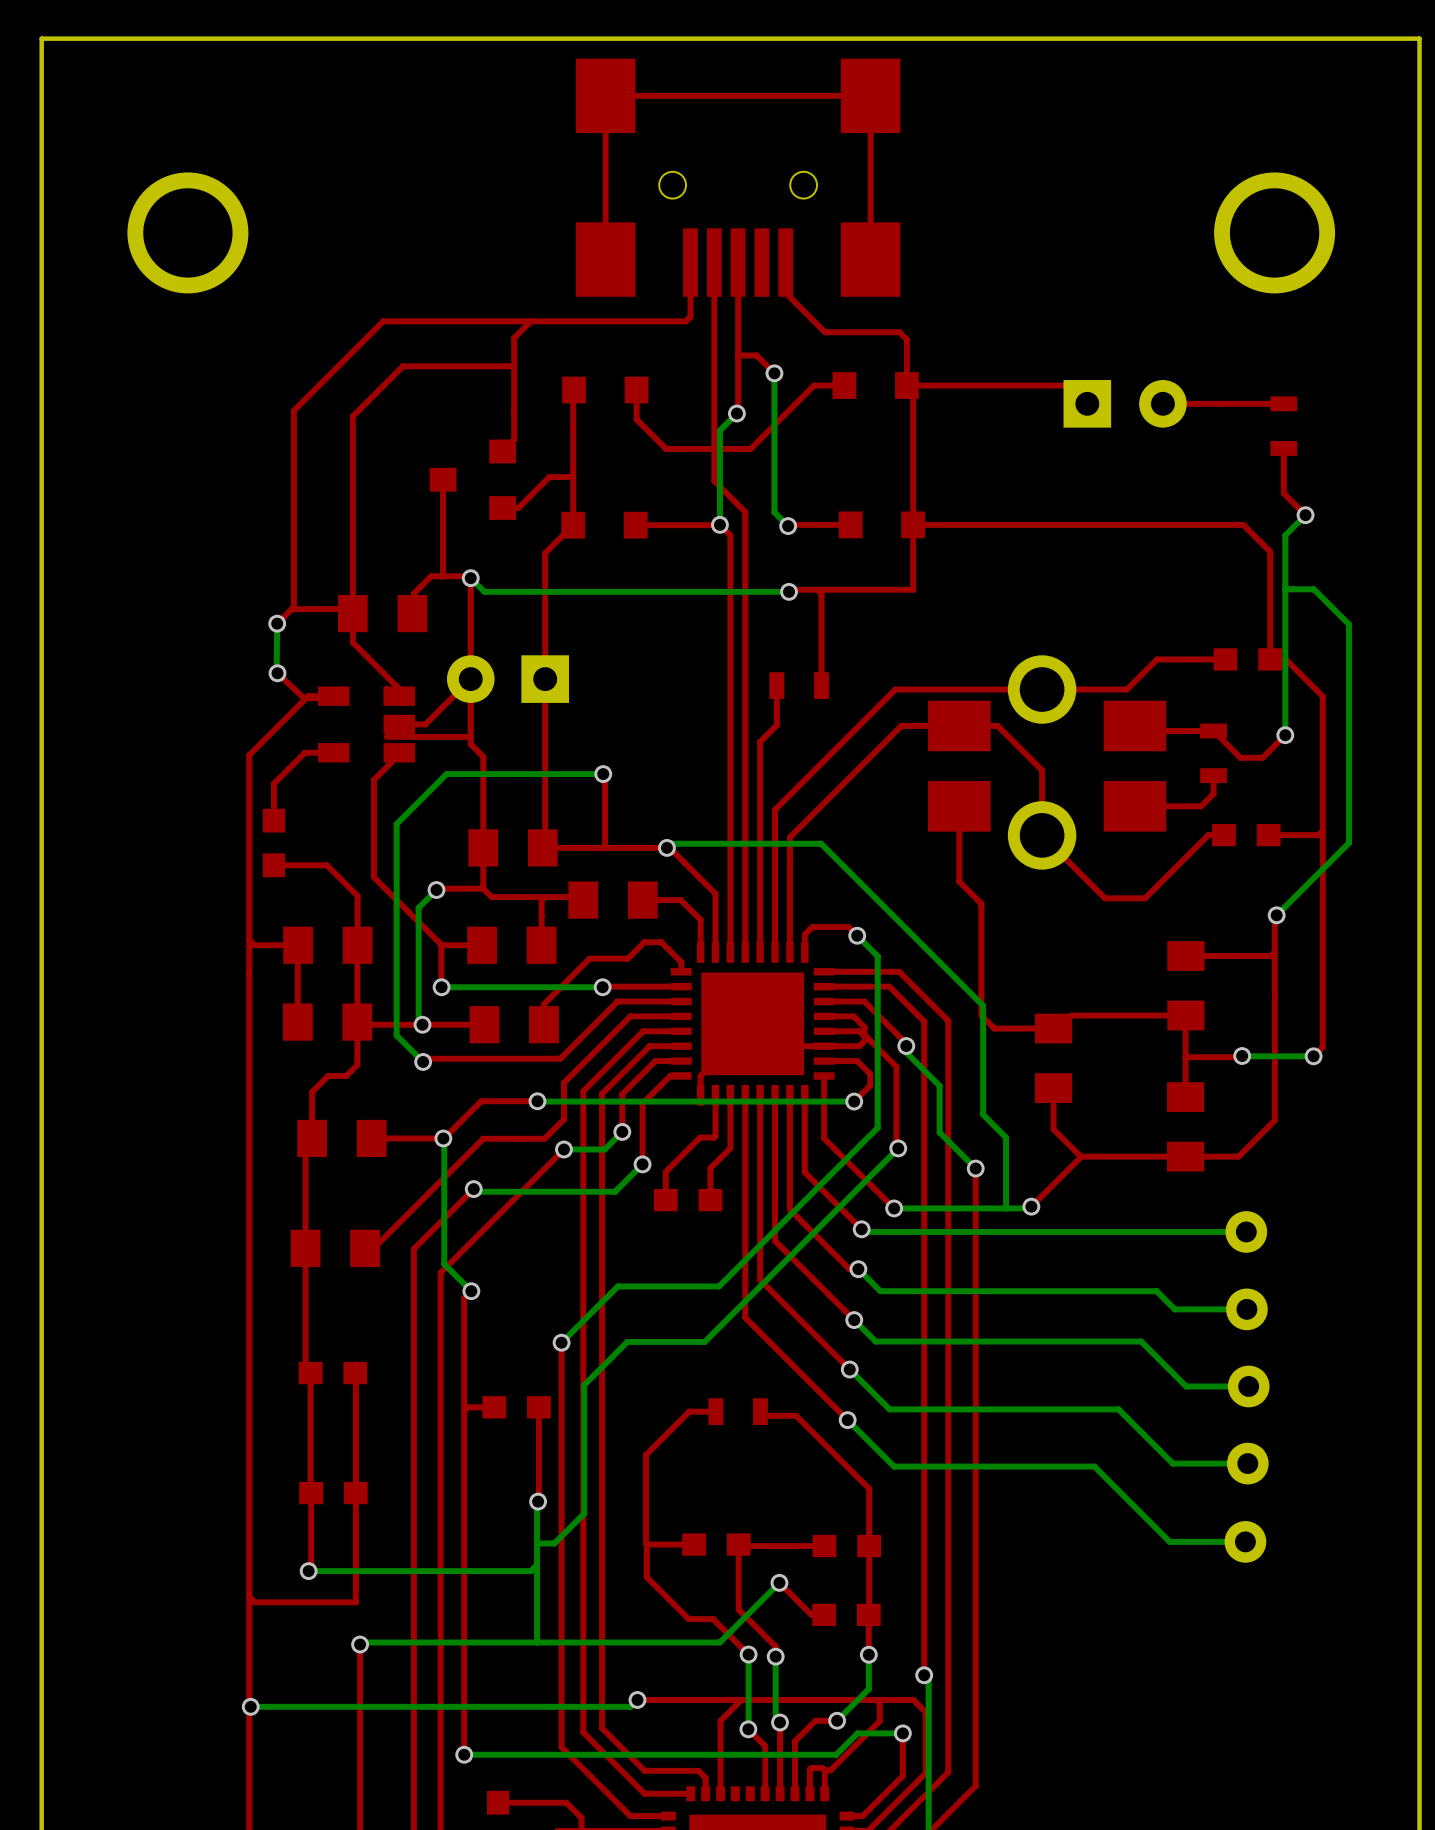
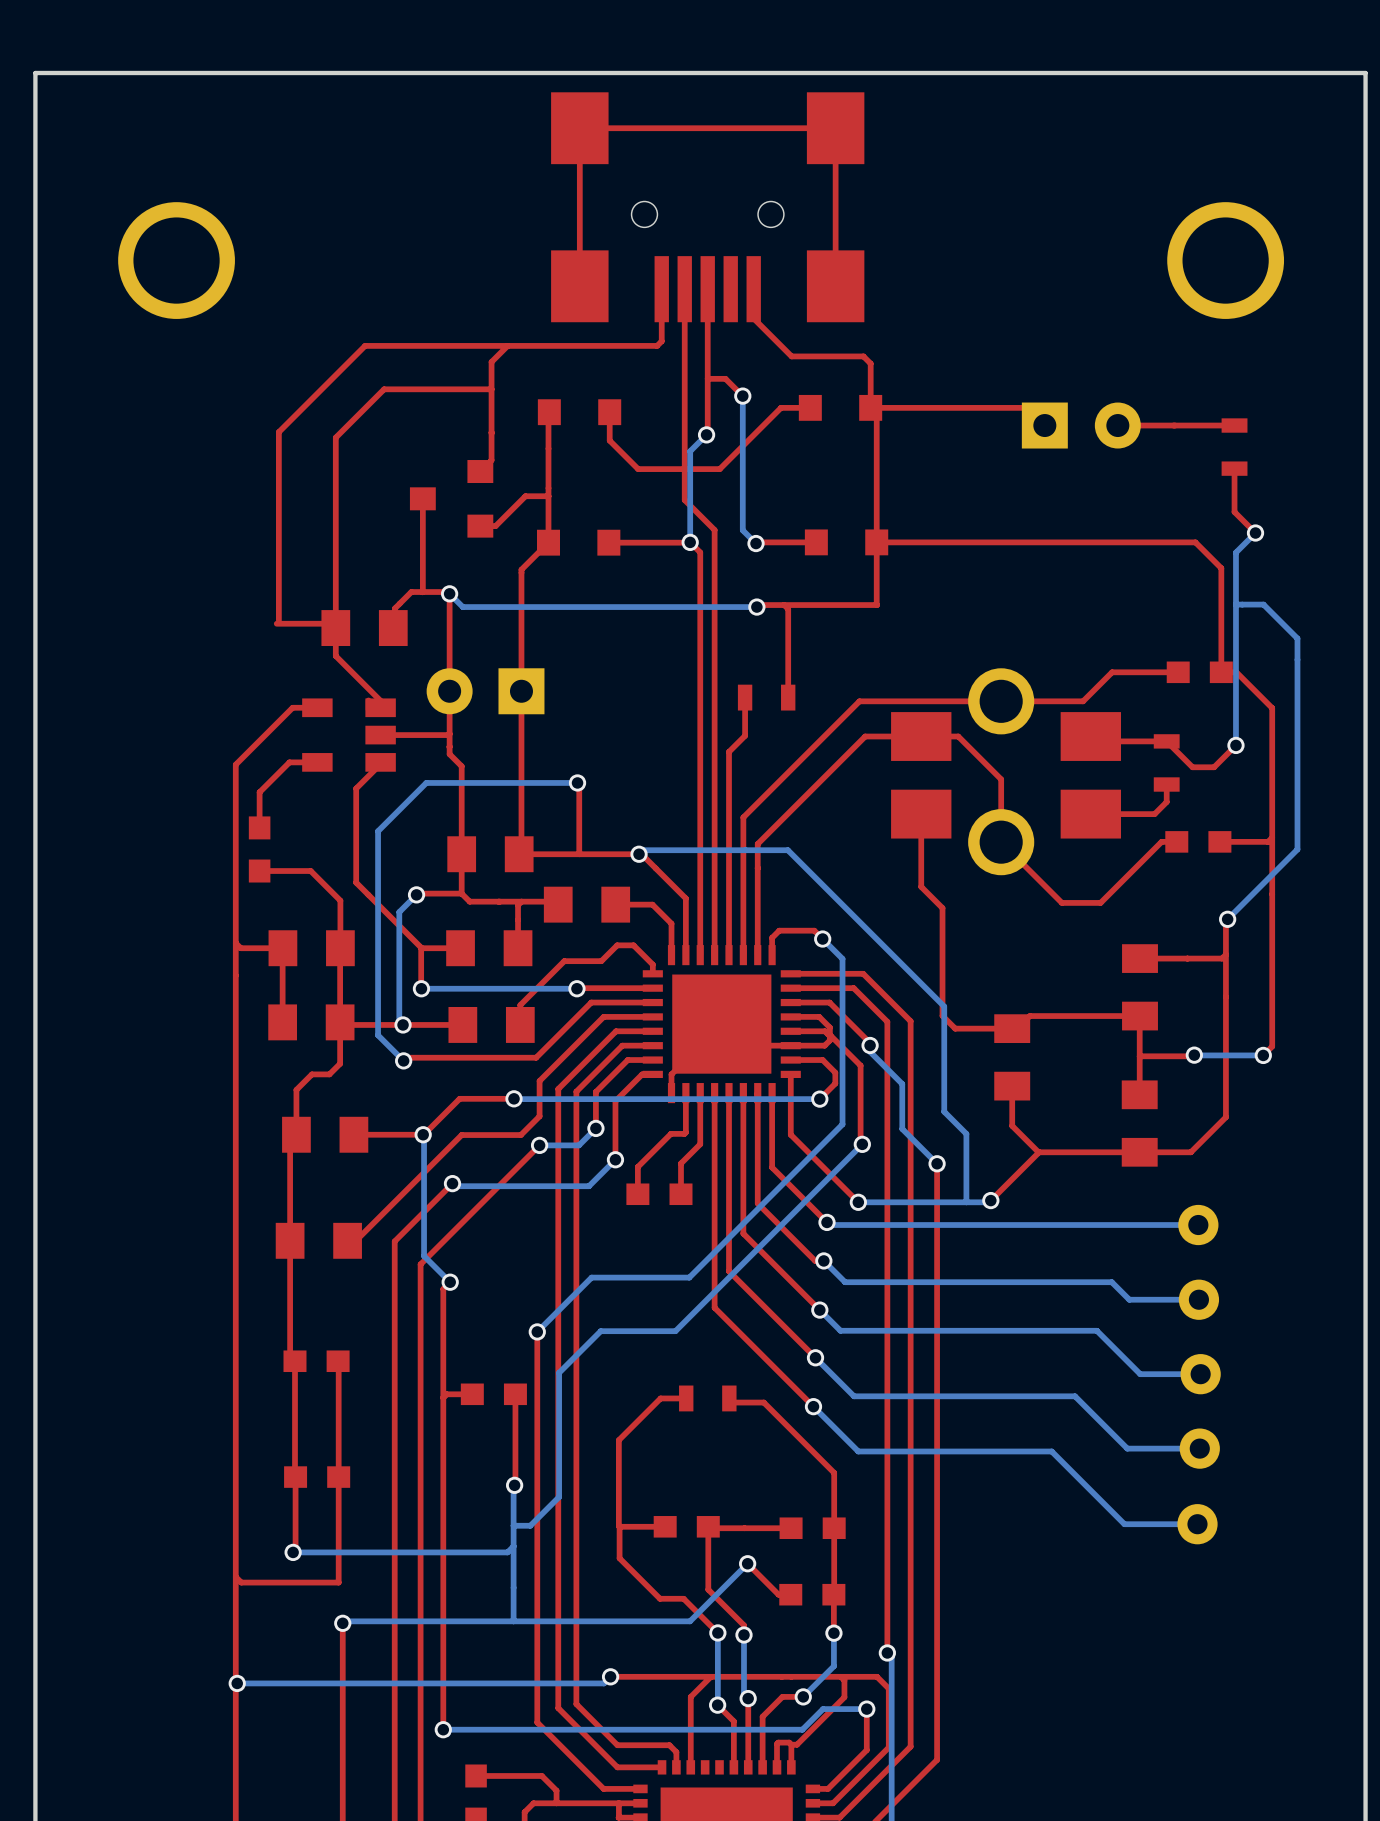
top track: (291, 609) (277, 623) -> none
bottom track: (277, 623) (277, 673) -> none
via: (277, 623) -> none
top track: (277, 673) (304, 698) (324, 698) -> none
via: (277, 673) -> none
top track: (470, 679) (425, 724) -> (449, 733) (405, 735)
top track: (470, 736) (386, 736) -> none

